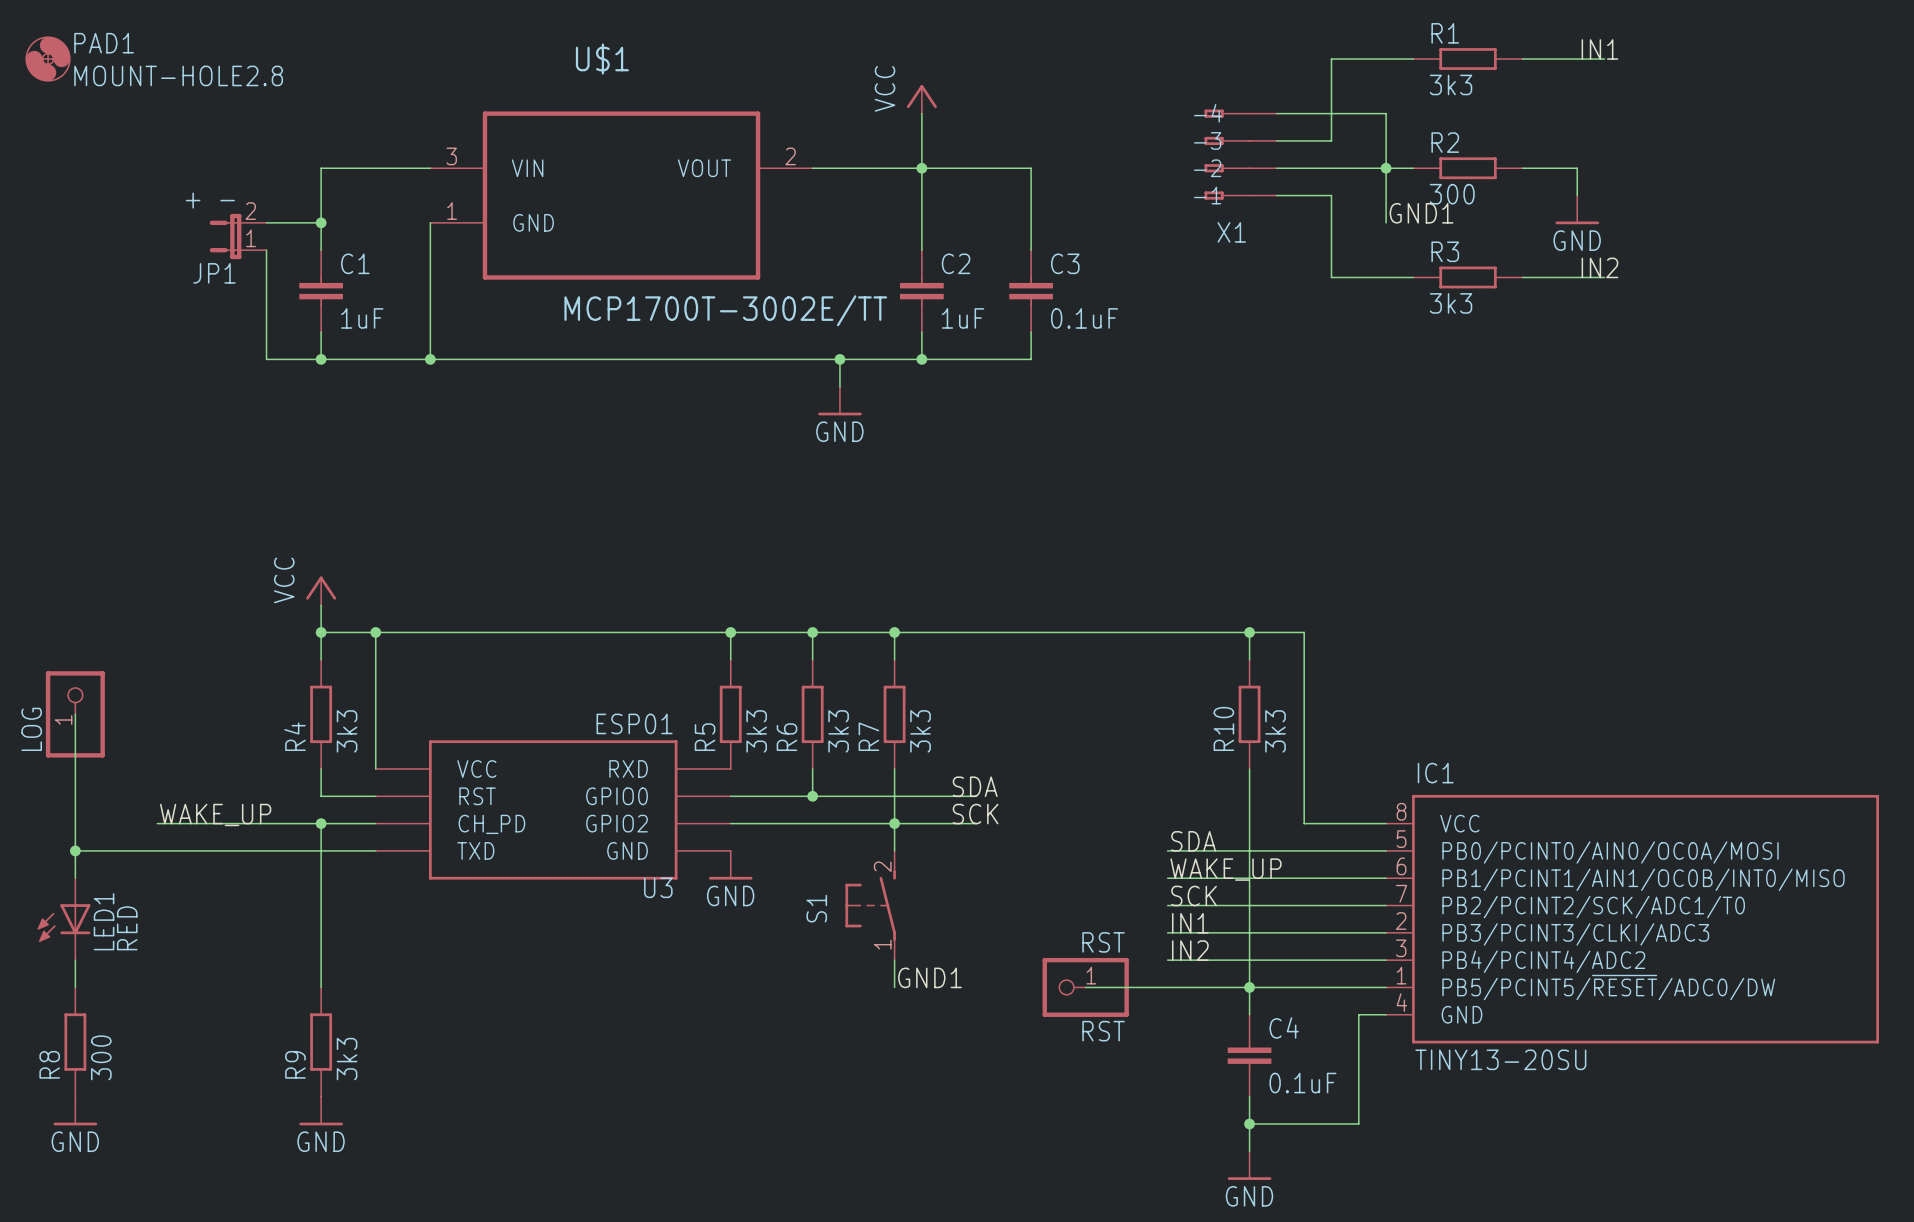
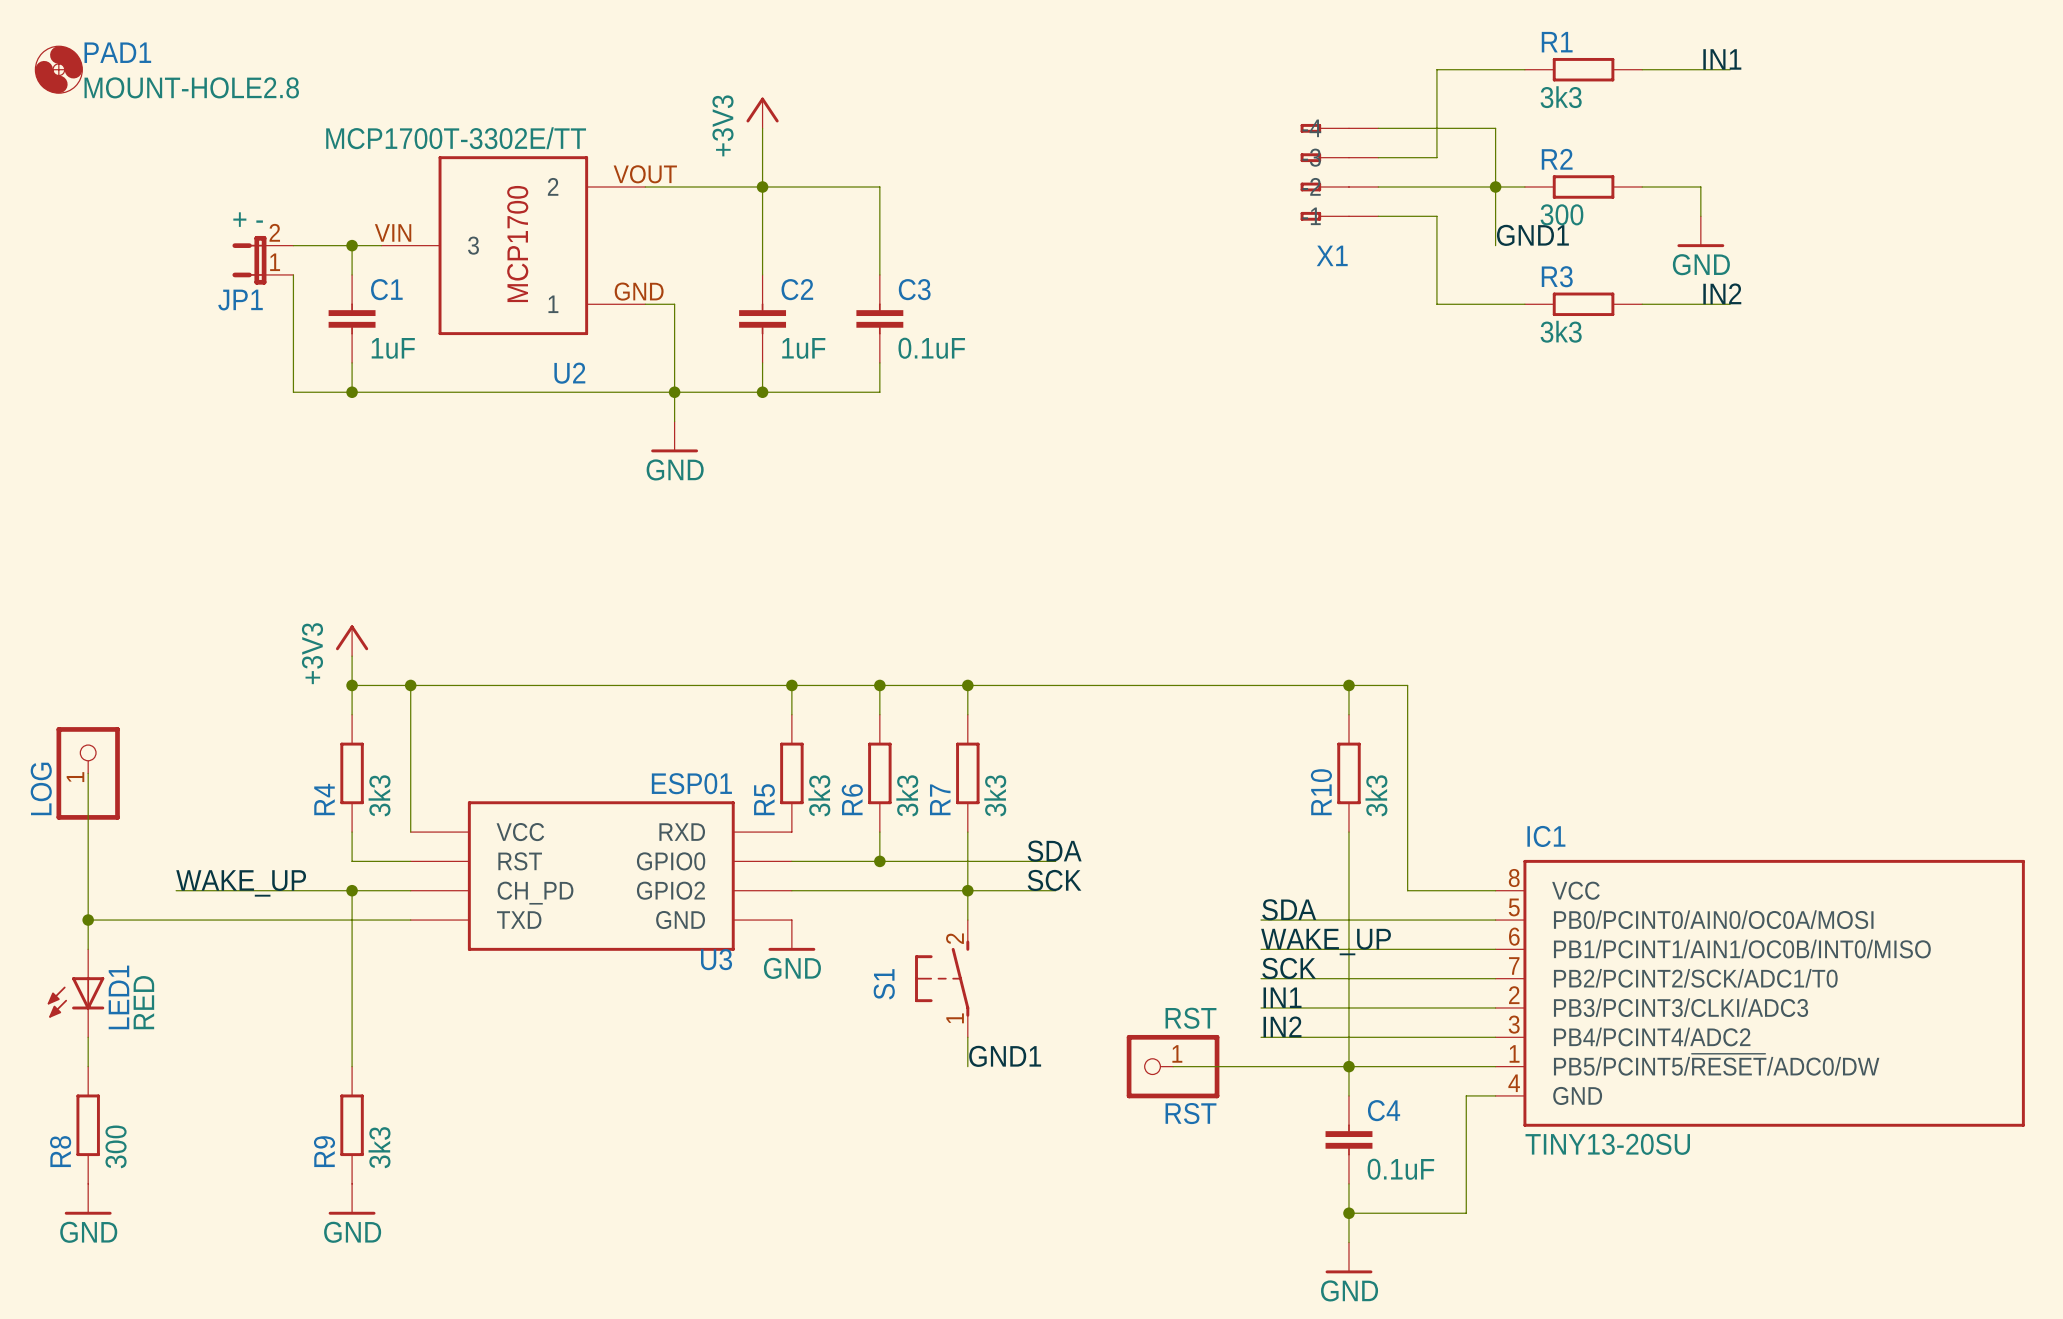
power symbol: none -> +3V3 (762, 112)
power symbol: VCC (921, 99) -> none
wire: (921, 113) (921, 250) -> (762, 128) (762, 274)
wire: (430, 168) (321, 168) (321, 222) -> (381, 245) (352, 245)
junction: none -> (762, 186)
wire: (812, 168) (1031, 168) (1031, 250) -> (645, 186) (879, 186) (879, 274)
junction: (921, 168) -> none
U$1: MCP1700T-3002E/TT (621, 195) -> none
wire: (430, 222) (430, 359) -> none
U2: none -> MCP1700T-3302E/TT (513, 245)
wire: none -> (645, 304) (674, 304) (674, 421)
C2 position: (921, 291) -> (762, 318)
C3 position: (1031, 291) -> (879, 318)
wire: (921, 332) (921, 359) -> (762, 362) (762, 392)
wire: (1031, 332) (1031, 359) (812, 359) -> (879, 362) (879, 392)
junction: (430, 359) -> none
junction: none -> (674, 392)
junction: none -> (762, 392)
wire: (839, 359) (839, 386) -> none
junction: (839, 359) -> none
junction: (921, 359) -> none
power symbol position: GND (839, 401) -> GND (674, 436)
power symbol: VCC (321, 590) -> +3V3 (352, 640)

